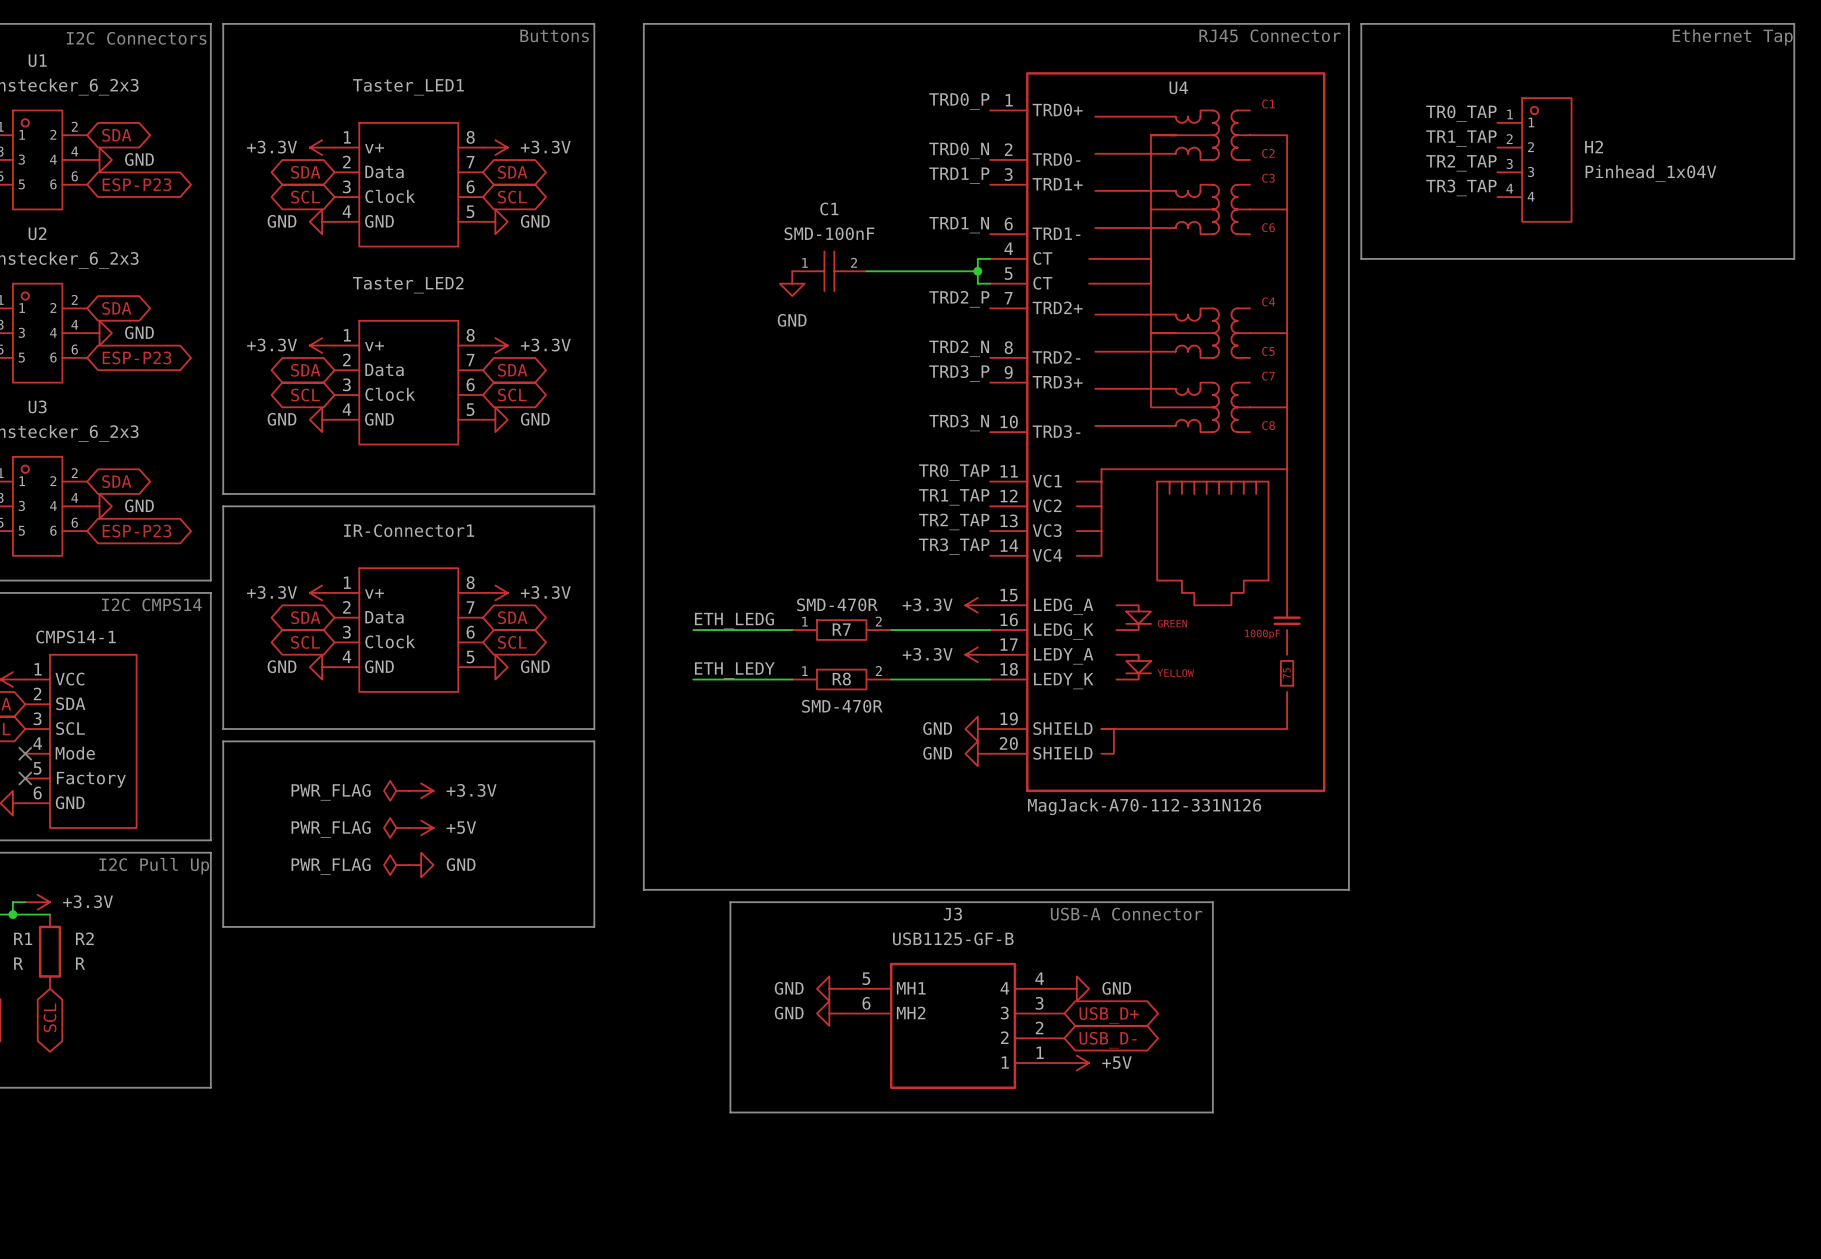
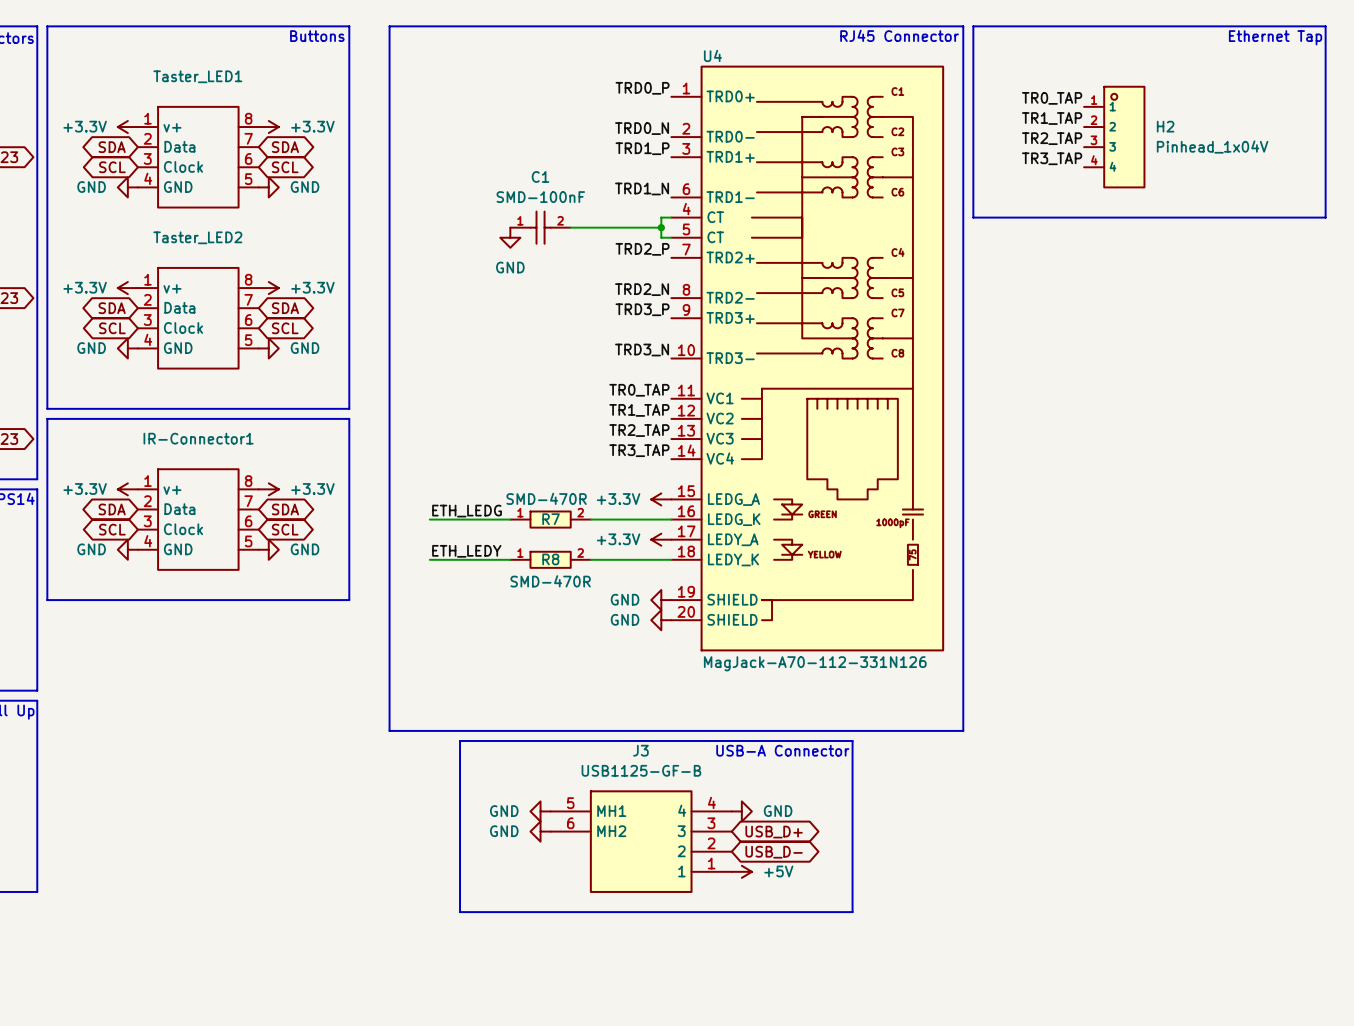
U4 name position: U4 (1178, 87) -> U4 (712, 55)
line: (223, 741) (594, 741) (594, 926) (223, 926) (223, 741) -> none
power symbol: PWR_FLAG (396, 790) -> none
power symbol: +3.3V (421, 790) -> none
power symbol: PWR_FLAG (396, 827) -> none
power symbol: +5V (421, 827) -> none
power symbol: PWR_FLAG (396, 865) -> none
power symbol: GND (421, 865) -> none

